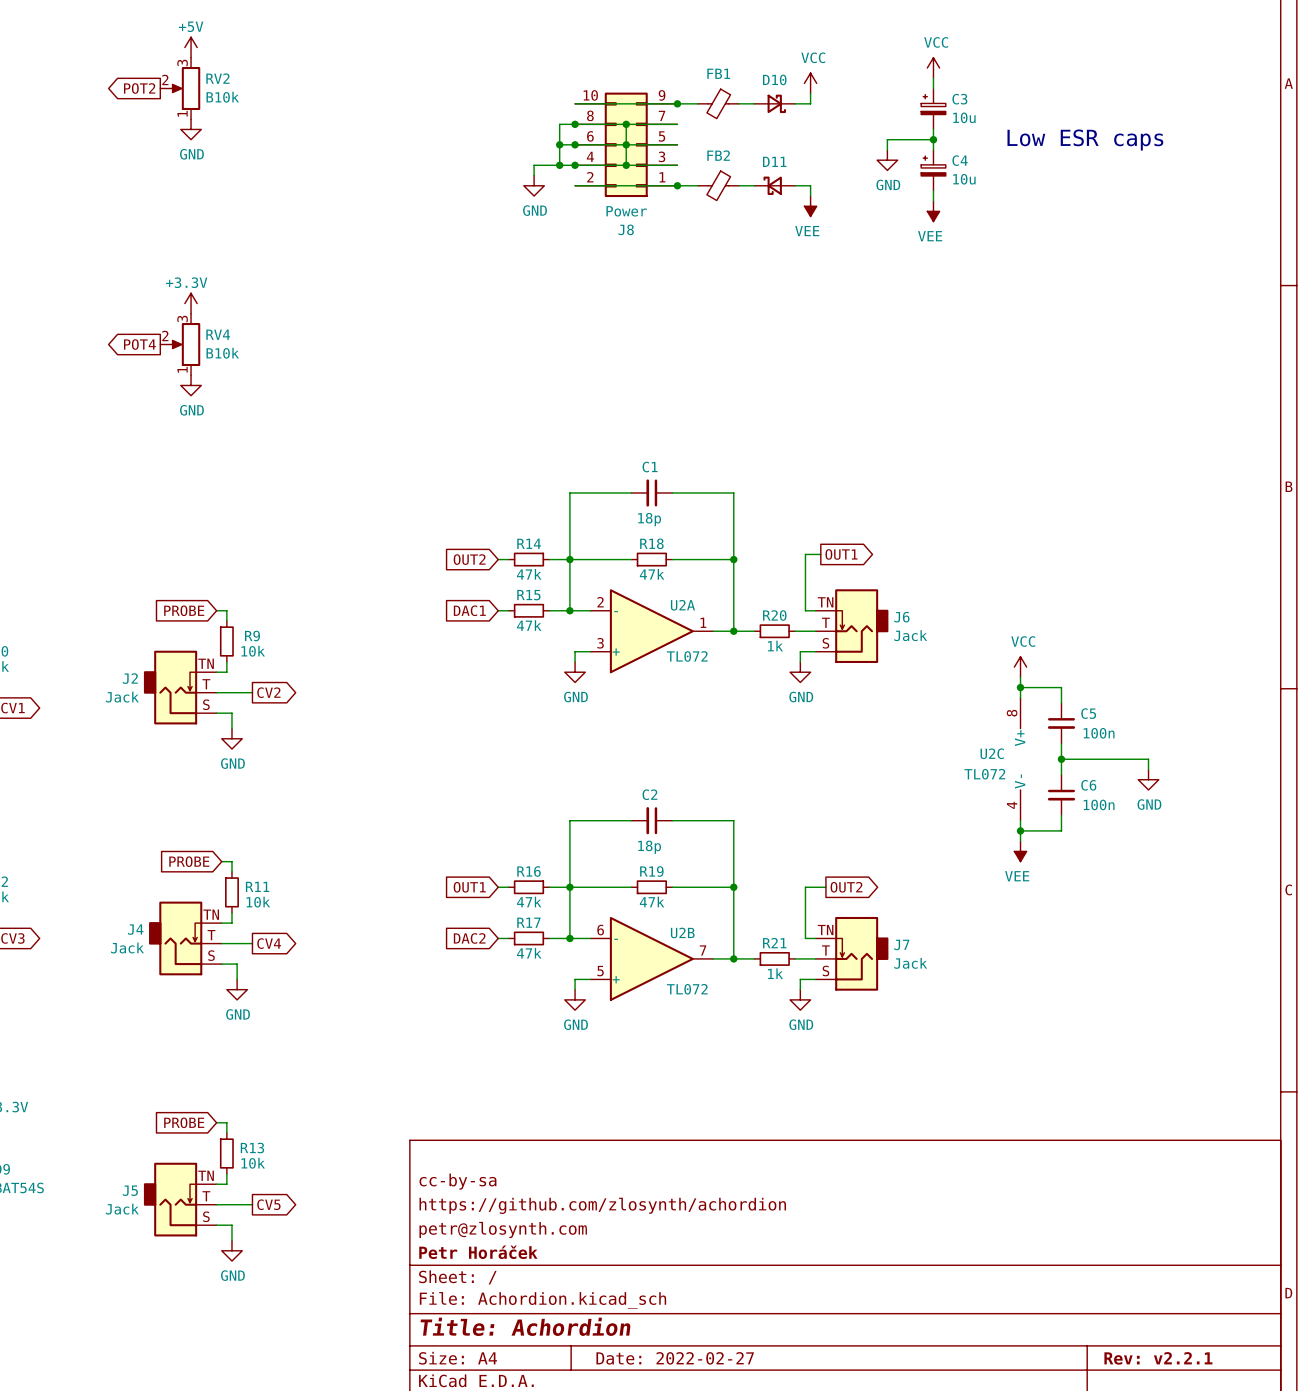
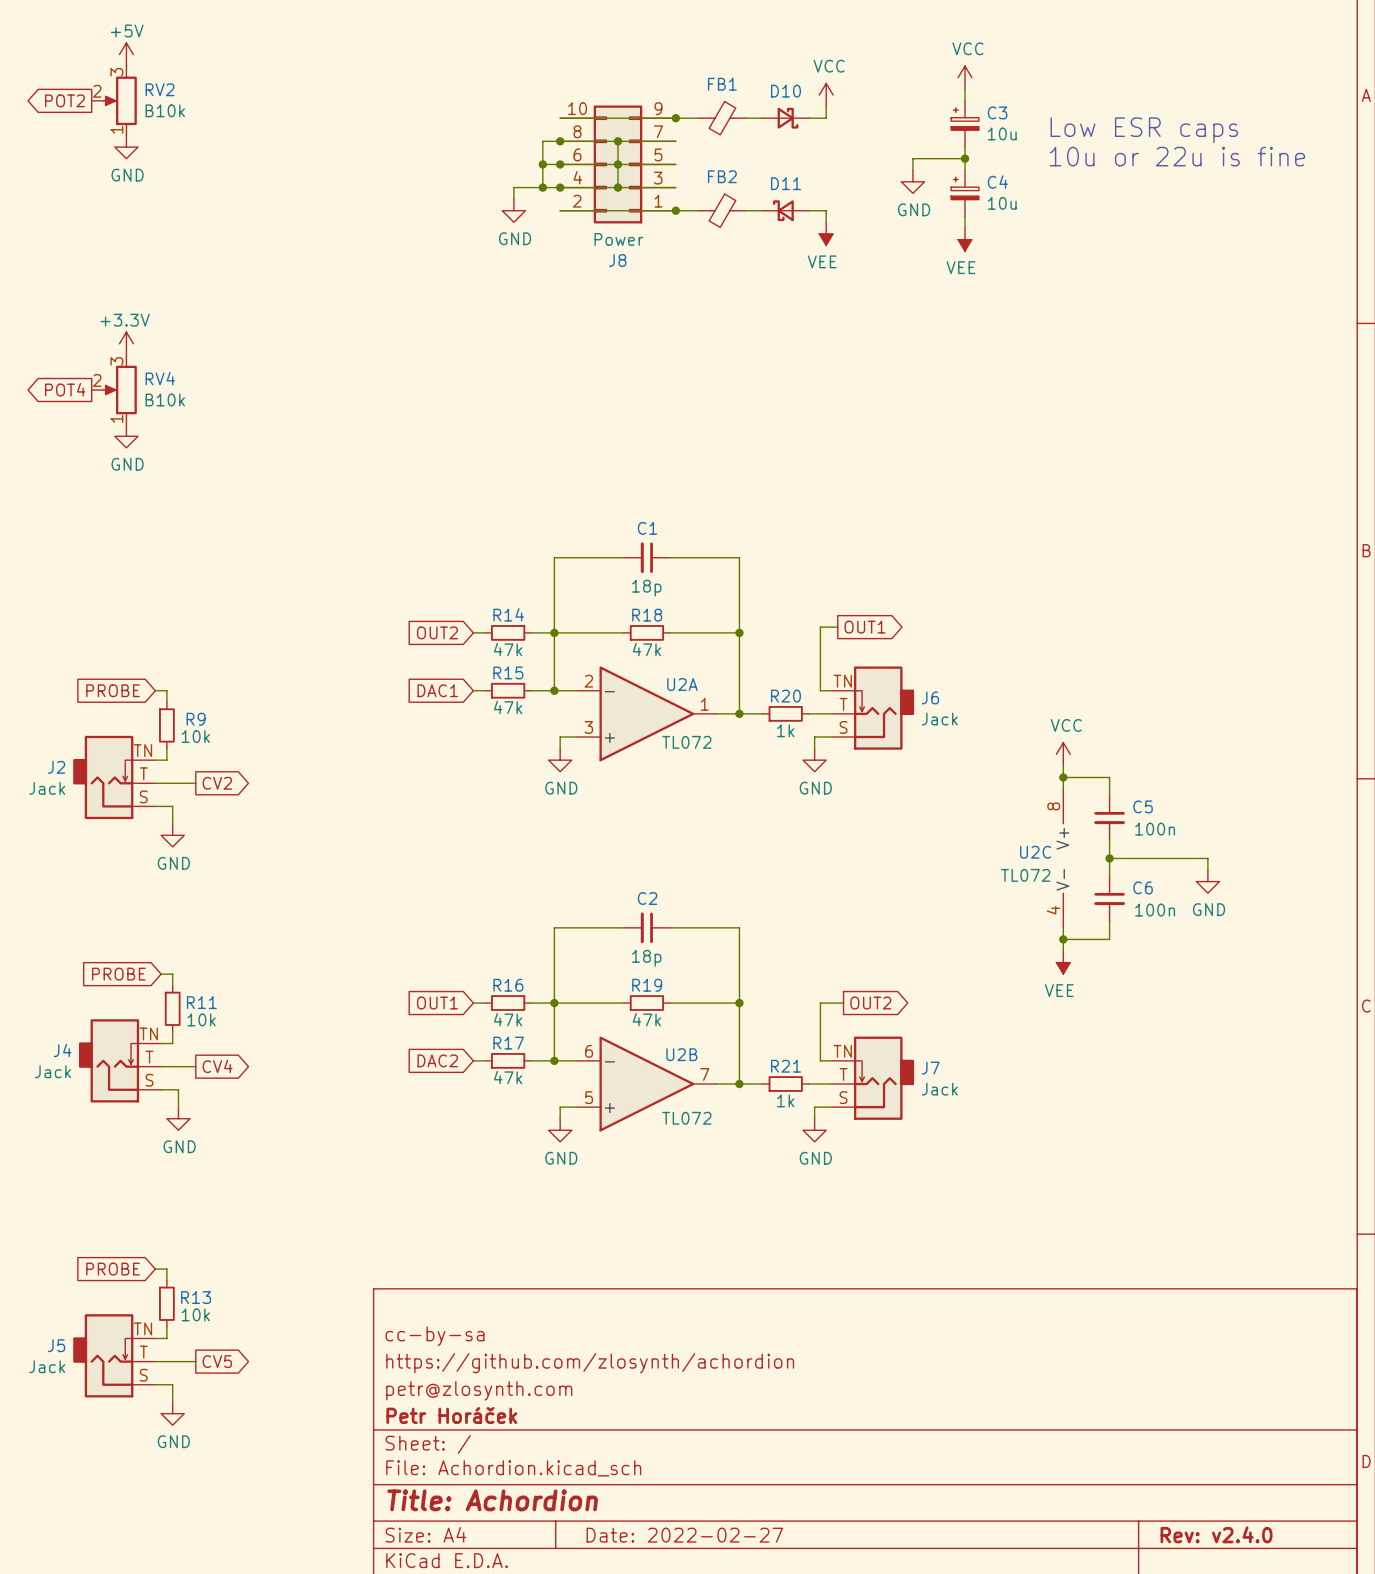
text: none -> Low ESR caps (1144, 130)
text: Low ESR caps (1085, 140) -> 10u or 22u is fine (1177, 156)
title block: Rev: v2.2.1 (1158, 1358) -> Rev: v2.4.0 (1216, 1534)

